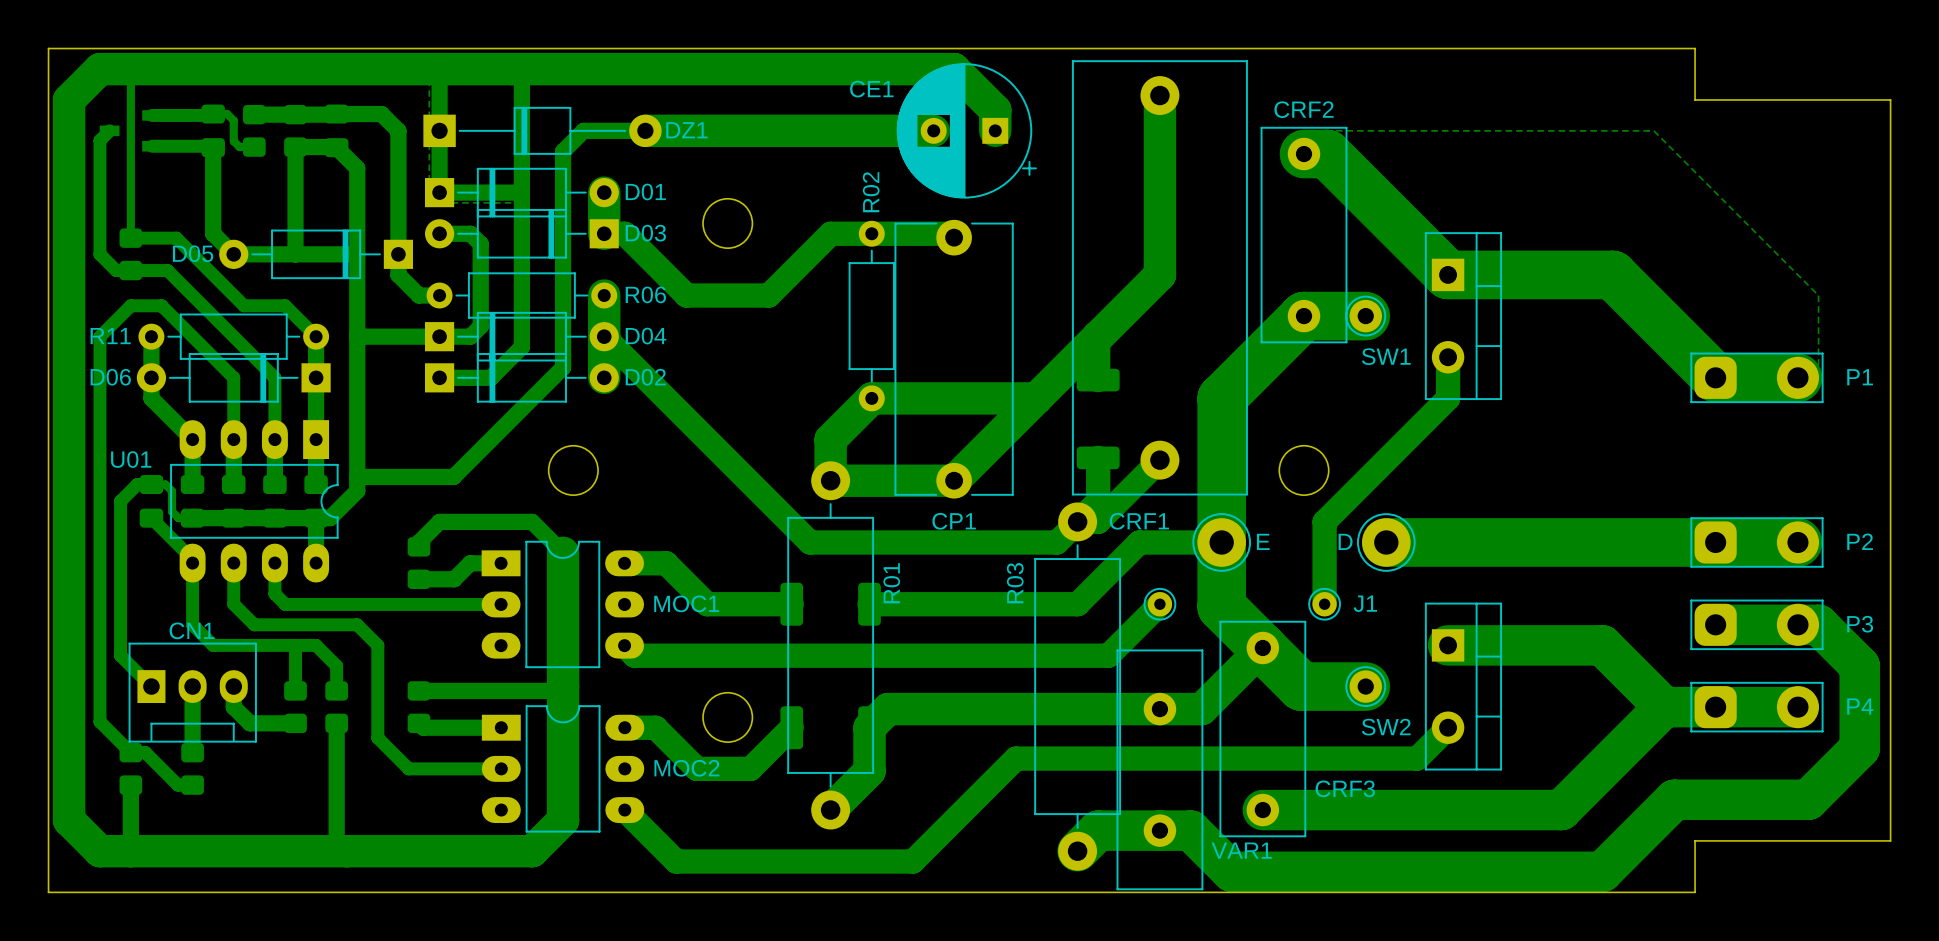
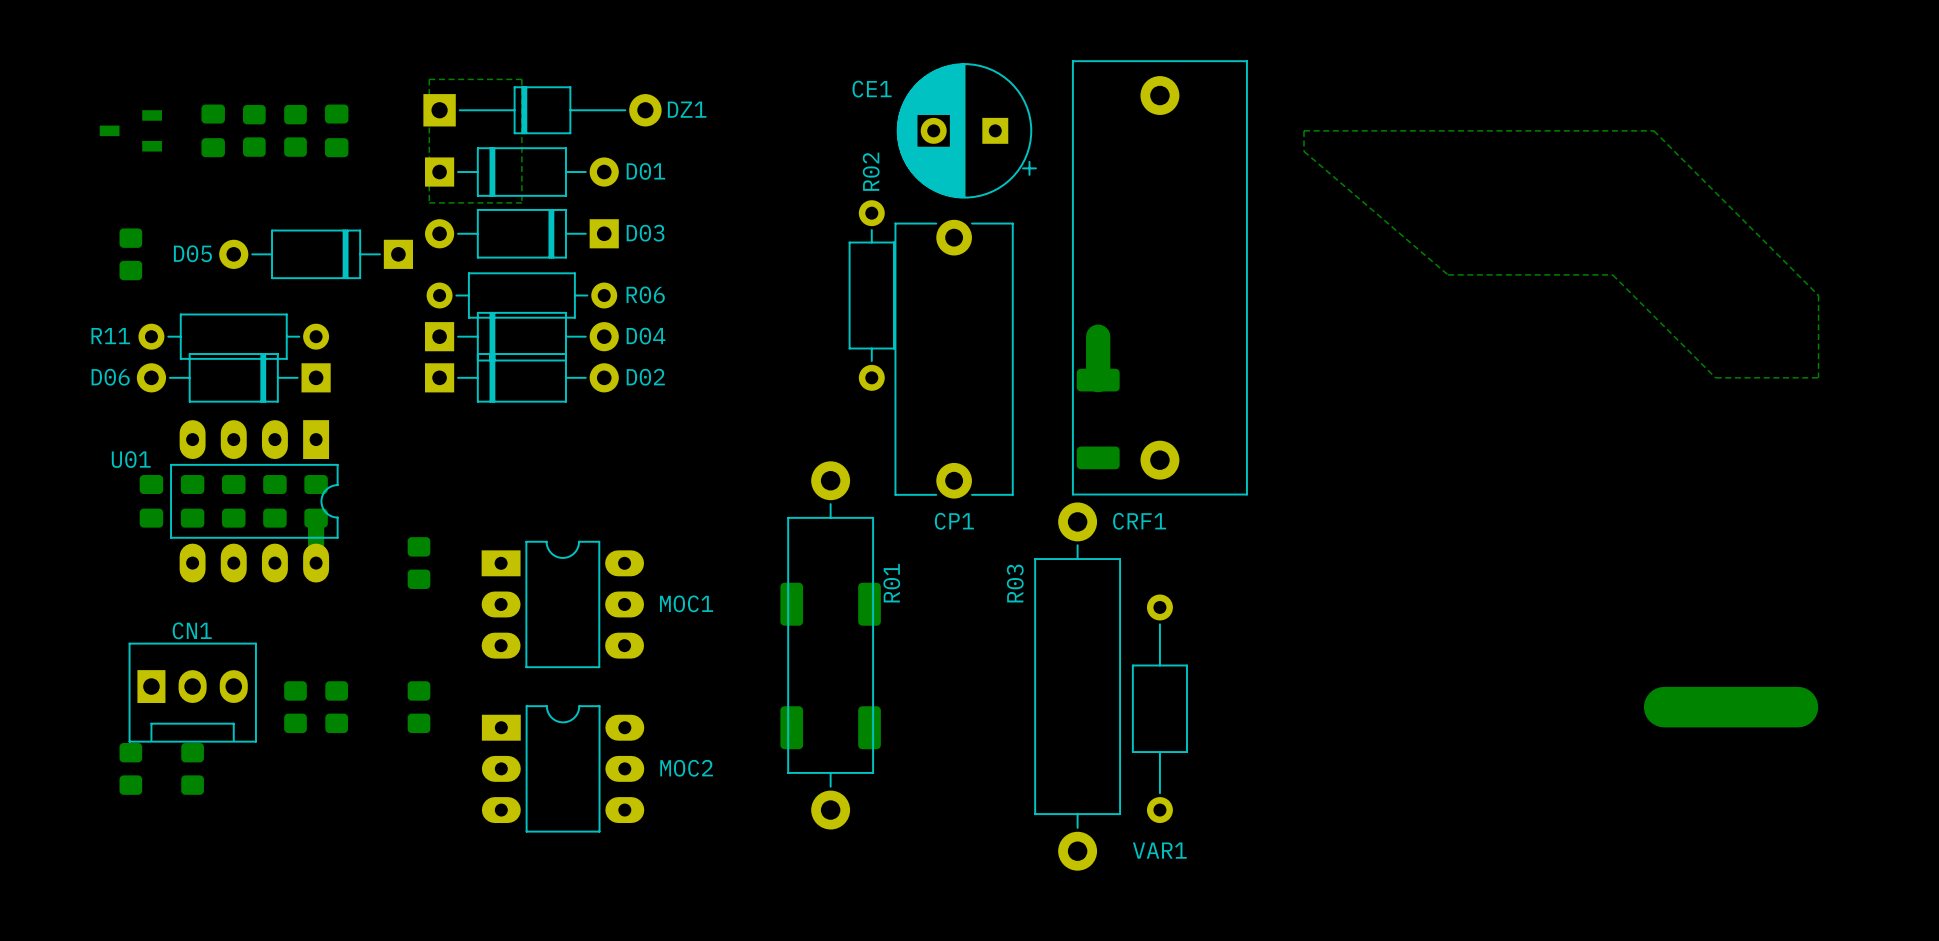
board edge: (48, 48) (1695, 48) (1695, 99) (1890, 99) (1890, 840) (1695, 840) (1695, 892) (48, 892) (48, 48) -> none
bottom track: (130, 69) (130, 238) (176, 238) (244, 305) (285, 305) (316, 336) (316, 484) -> none
bottom track: (439, 69) (439, 192) (521, 192) -> none
bottom track: (521, 69) (521, 346) (491, 377) (439, 377) -> none
bottom track: (1159, 95) (1159, 274) (954, 480) (830, 480) (830, 439) (871, 398) (1036, 398) -> none
bottom track: (254, 114) (381, 114) (398, 130) (398, 274) (419, 295) (439, 295) -> none
bottom track: (152, 115) (227, 114) (233, 120) (233, 141) (239, 147) (254, 147) -> none
bottom track: (109, 130) (99, 140) (99, 254) (116, 270) (167, 270) (274, 377) (274, 484) -> none
DZ1 position: (542, 130) -> (542, 110)
bottom track: (933, 130) (583, 130) (563, 151) (563, 367) (453, 476) (357, 476) -> none
bottom track: (995, 130) (995, 110) (954, 69) (99, 69) (69, 99) (69, 820) (99, 851) (532, 851) (563, 820) (563, 552) (532, 521) (439, 521) (419, 542) (419, 546) -> none
bottom track: (152, 146) (213, 147) (213, 233) (233, 254) (357, 254) -> none
bottom track: (1304, 154) (1327, 154) (1448, 274) (1612, 274) (1715, 377) (1797, 377) -> none
D01 position: (521, 192) -> (521, 172)
bottom track: (604, 192) (604, 233) (624, 233) (686, 295) (768, 295) (830, 233) (950, 233) (954, 237) -> none
round board edge: [702, 197, 754, 249] -> none
bottom track: (439, 233) (470, 233) (480, 244) (480, 326) (470, 336) (357, 336) -> none
CRF2: (1304, 235) -> none
bottom track: (295, 254) (295, 147) (336, 147) (357, 168) (357, 491) (330, 518) (178, 518) (172, 511) (172, 491) (165, 484) (137, 484) (120, 501) (120, 655) (151, 686) -> none
bottom track: (604, 295) (604, 377) -> none
R02 position: (871, 316) -> (871, 295)
bottom track: (1365, 316) (1304, 316) (1221, 398) (1221, 606) (1301, 686) (1365, 686) -> none
part: (1365, 316) -> none
SW1: (1463, 316) -> none
bottom track: (151, 336) (151, 398) (192, 439) (192, 484) -> none
bottom track: (604, 336) (810, 542) (1057, 542) (1098, 501) (1098, 457) -> none
bottom track: (1448, 357) (1448, 398) (1324, 521) (1324, 604) -> none
P1: (1756, 377) -> none
round board edge: [547, 444, 599, 496] -> none
round board edge: [1278, 444, 1330, 496] -> none
bottom track: (1159, 460) (1098, 521) (1077, 521) -> none
bottom track: (233, 484) (233, 377) (161, 305) (130, 305) (99, 336) (99, 721) (130, 752) (145, 752) (177, 785) (192, 785) -> none
bottom track: (151, 518) (192, 559) (192, 624) (213, 645) (316, 645) (336, 665) (336, 690) -> none
bottom track: (1221, 542) (1139, 542) (1077, 604) (869, 604) -> none
E: (1221, 542) -> none
bottom track: (1386, 542) (1797, 542) -> none
D: (1386, 542) -> none
P2: (1756, 542) -> none
bottom track: (233, 563) (233, 604) (254, 624) (357, 624) (377, 645) (377, 738) (408, 768) (501, 768) -> none
bottom track: (274, 563) (274, 593) (285, 604) (501, 604) -> none
bottom track: (501, 563) (470, 563) (454, 579) (419, 579) -> none
bottom track: (624, 563) (666, 563) (707, 604) (791, 604) -> none
text: J1 (1365, 603) -> none
bottom track: (1159, 604) (1108, 655) (634, 655) (624, 645) -> none
part: (1159, 604) -> none
part: (1324, 604) -> none
bottom track: (1715, 624) (1818, 624) (1859, 665) (1859, 748) (1808, 799) (1674, 799) (1602, 871) (1231, 871) (1190, 830) (1098, 830) (1077, 851) -> none
P3: (1756, 624) -> none
bottom track: (295, 645) (295, 690) -> none
bottom track: (1448, 645) (1602, 645) (1664, 707) (1561, 810) (1262, 810) -> none
bottom track: (1262, 647) (1201, 709) (888, 709) (869, 727) (869, 771) (830, 810) -> none
VAR1 footprint: [1116, 649, 1204, 891] -> [1131, 594, 1188, 824]
bottom track: (192, 686) (192, 752) -> none
bottom track: (233, 686) (233, 707) (249, 723) (295, 723) -> none
bottom track: (563, 686) (558, 690) (419, 690) -> none
part: (1365, 686) -> none
SW2: (1463, 686) -> none
round board edge: [702, 691, 754, 743] -> none
P4: (1756, 707) -> none
bottom track: (336, 723) (336, 840) (346, 851) -> none
bottom track: (419, 723) (423, 727) (501, 727) -> none
bottom track: (624, 727) (655, 727) (696, 768) (750, 768) (791, 727) -> none
bottom track: (1448, 727) (1417, 758) (1015, 758) (912, 861) (676, 861) (624, 810) -> none
CRF3: (1262, 729) -> none
bottom track: (130, 785) (130, 851) -> none
VAR1 name position: VAR1 (1241, 850) -> VAR1 (1159, 850)

